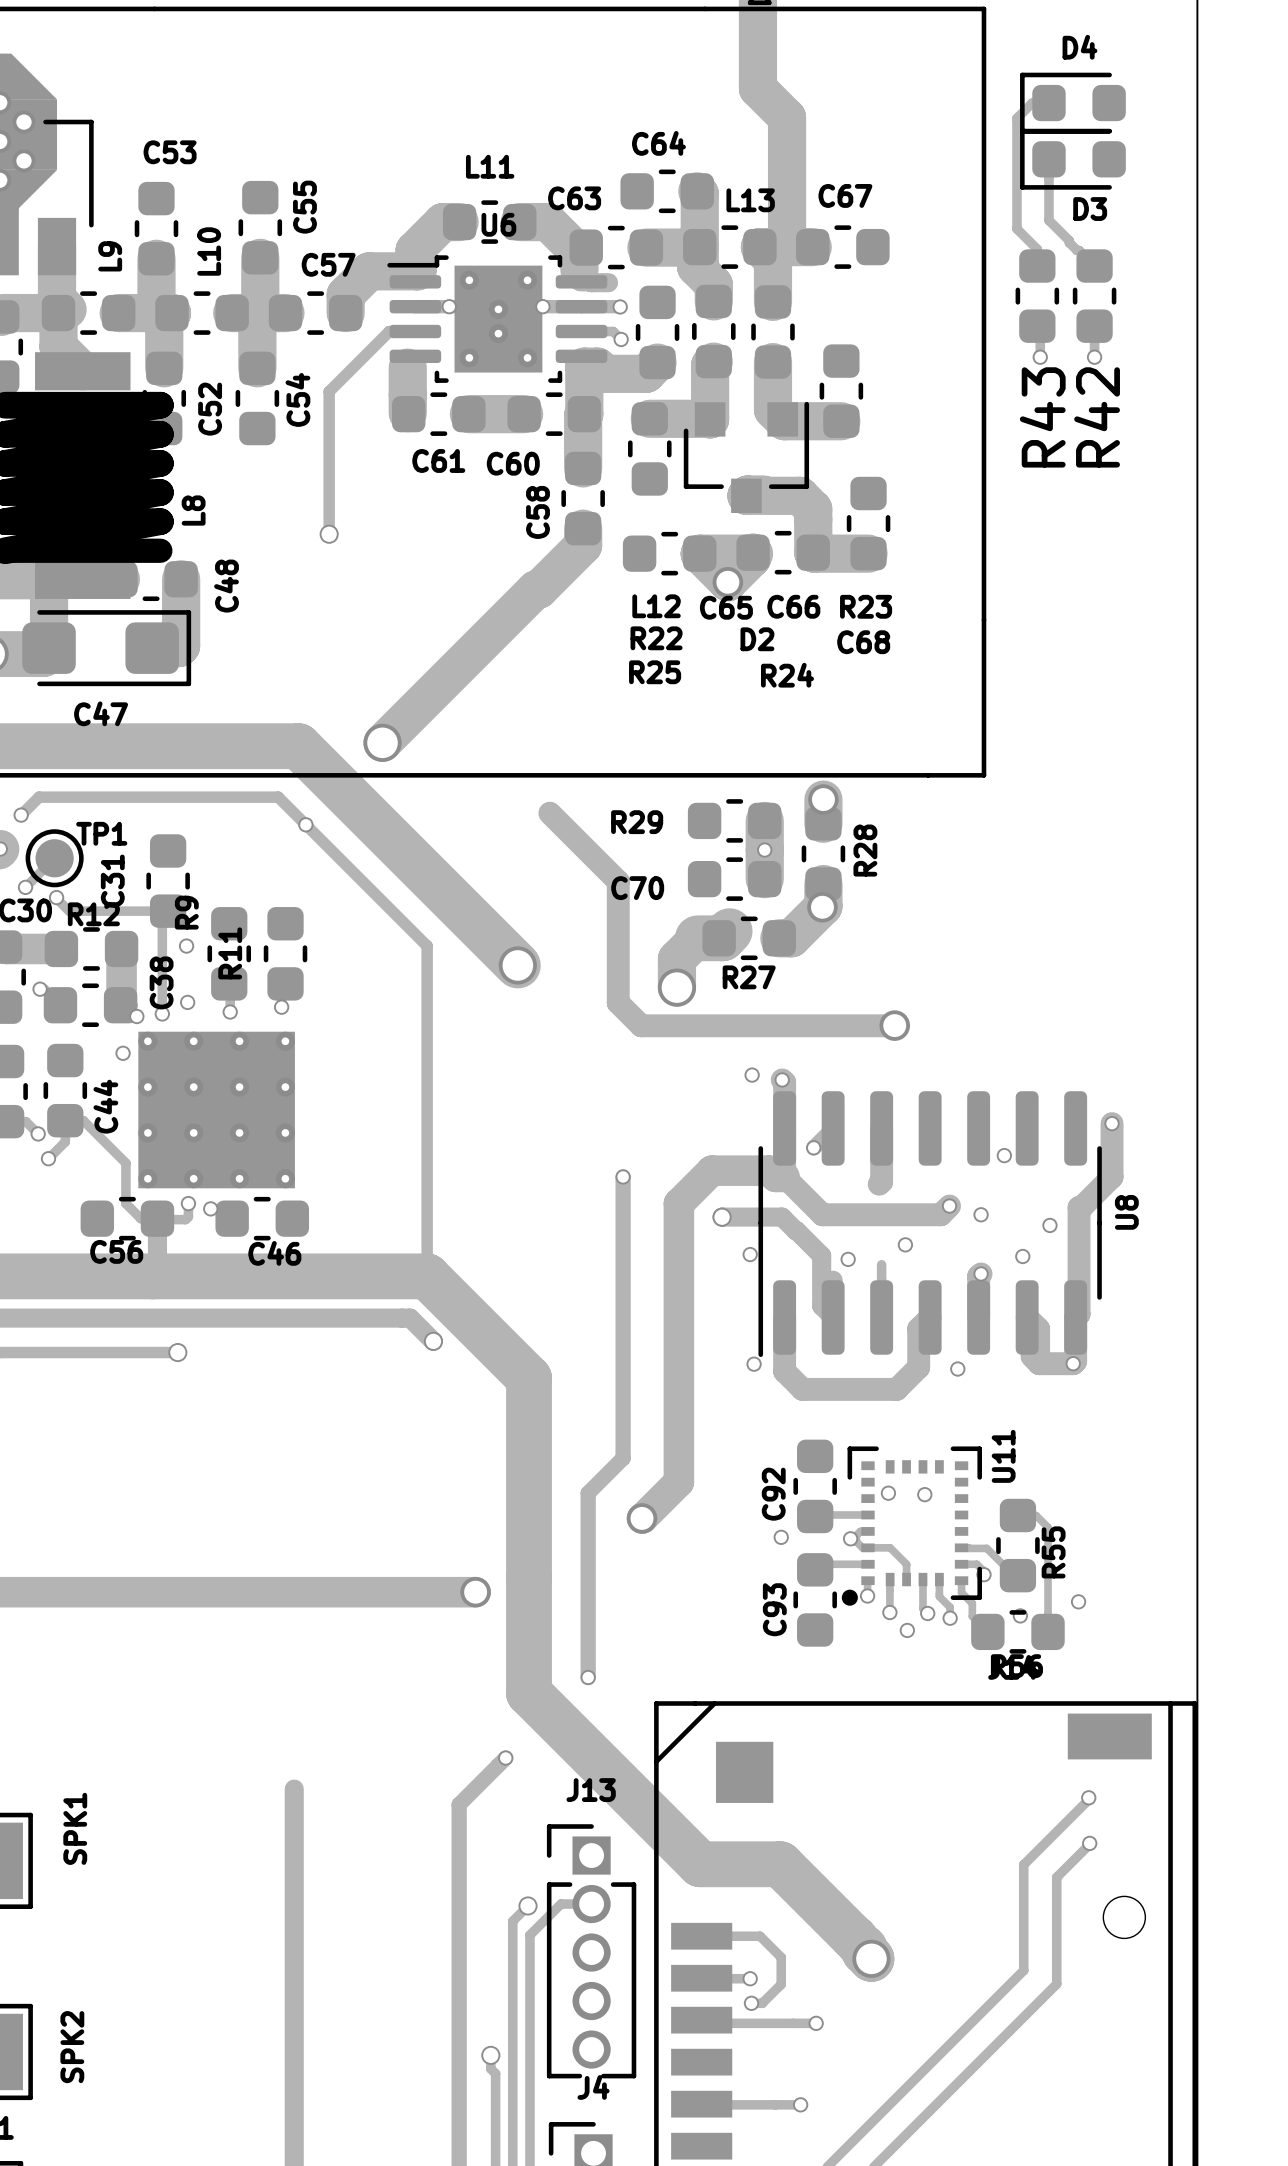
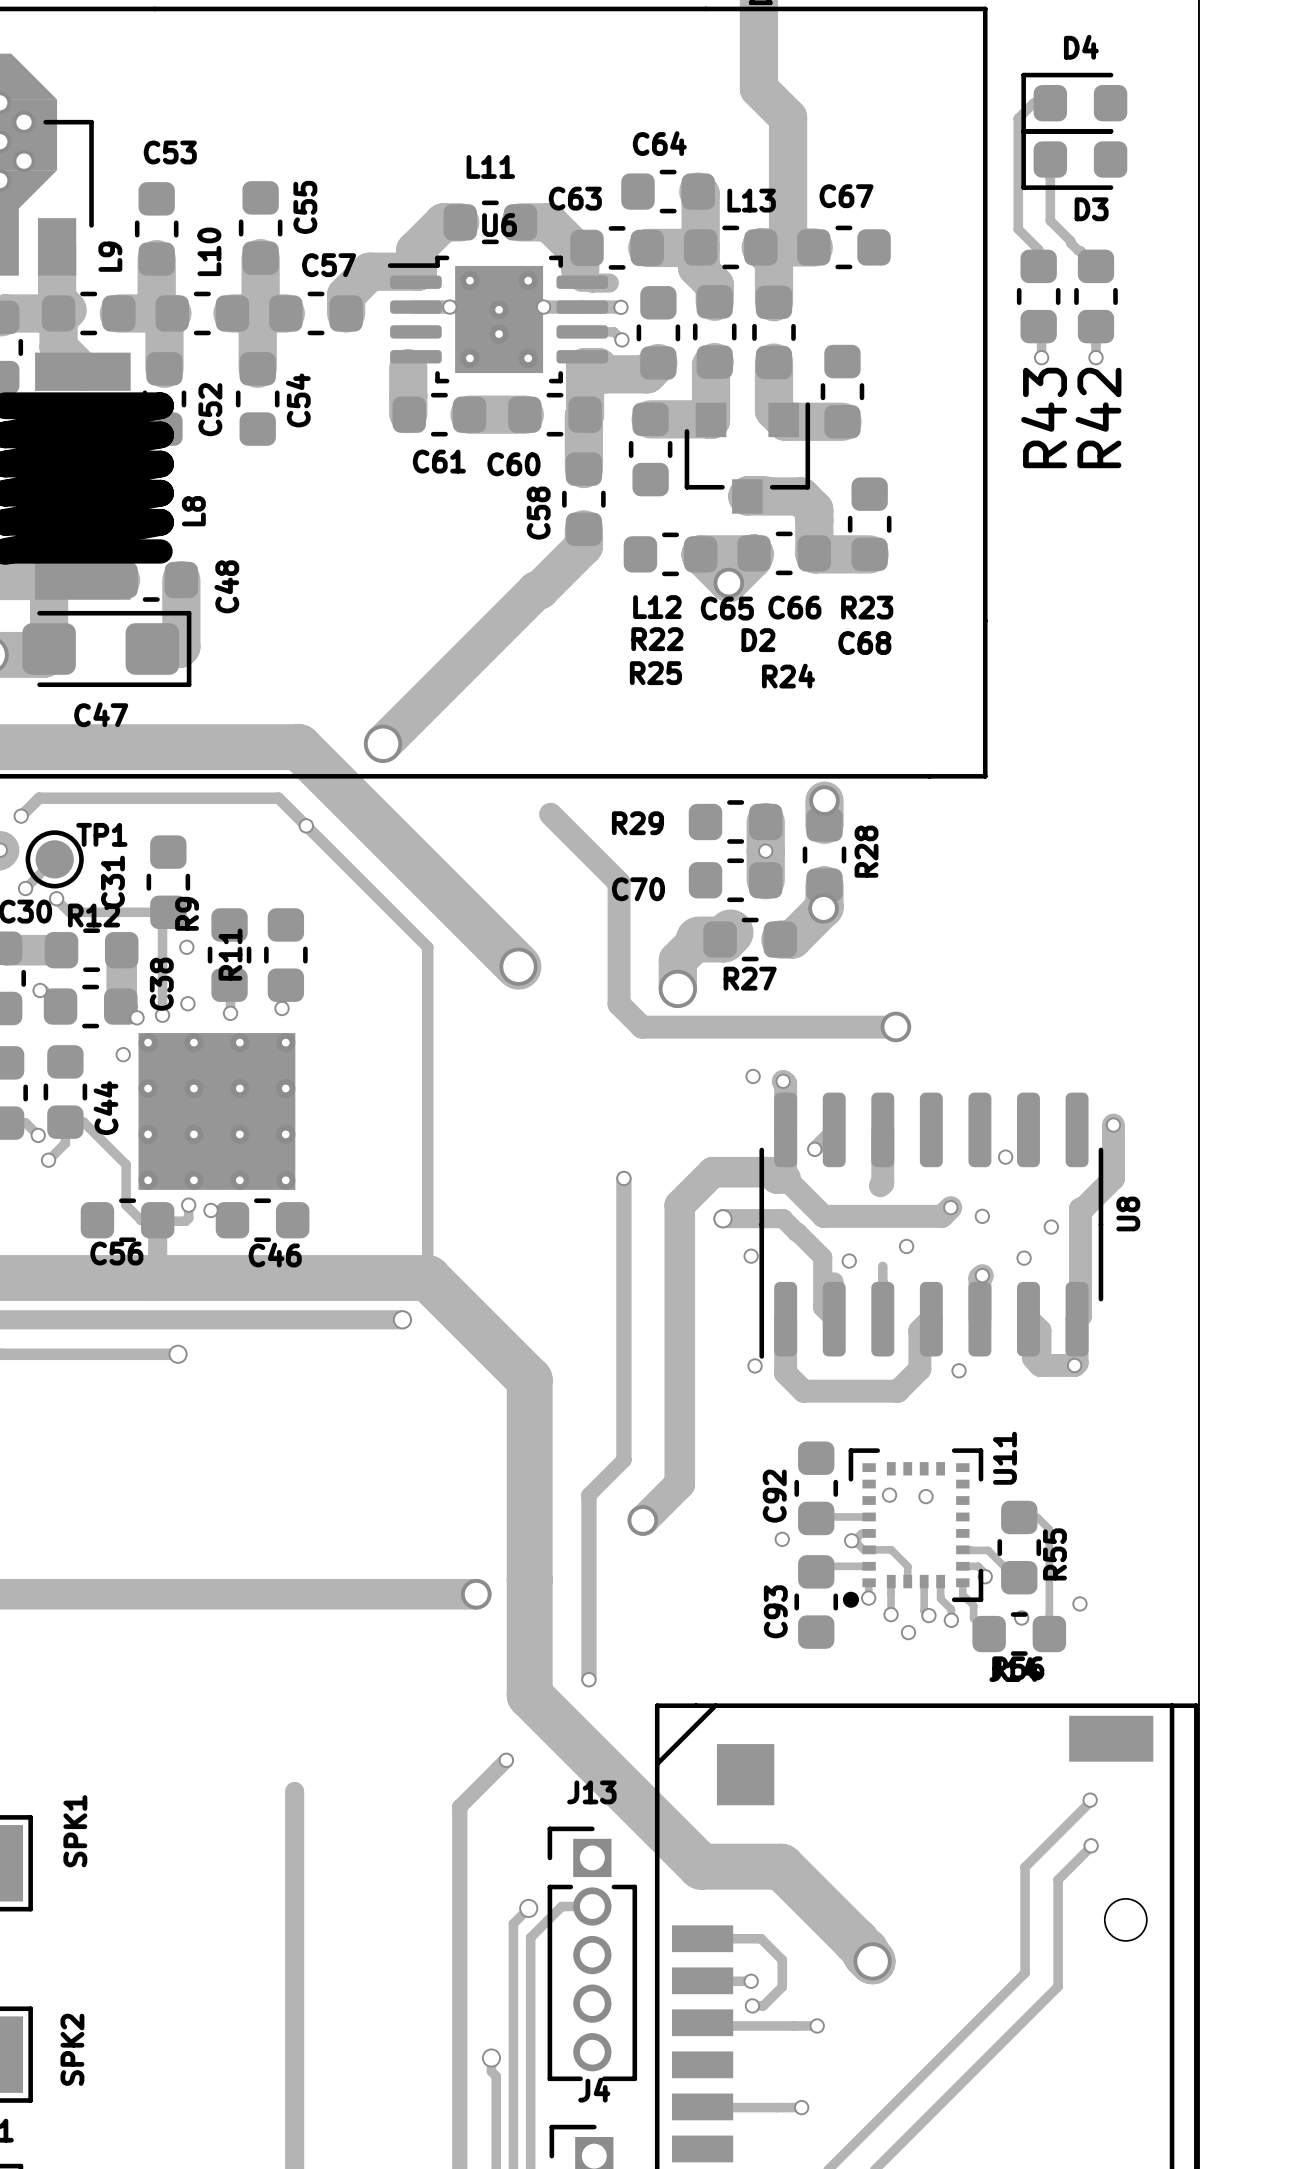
track: (415, 331) (389, 331) (329, 391) (329, 534) -> none
via: (329, 534) -> none
track: (401, 1318) (410, 1318) (433, 1341) -> none
via position: (433, 1341) -> (402, 1319)

